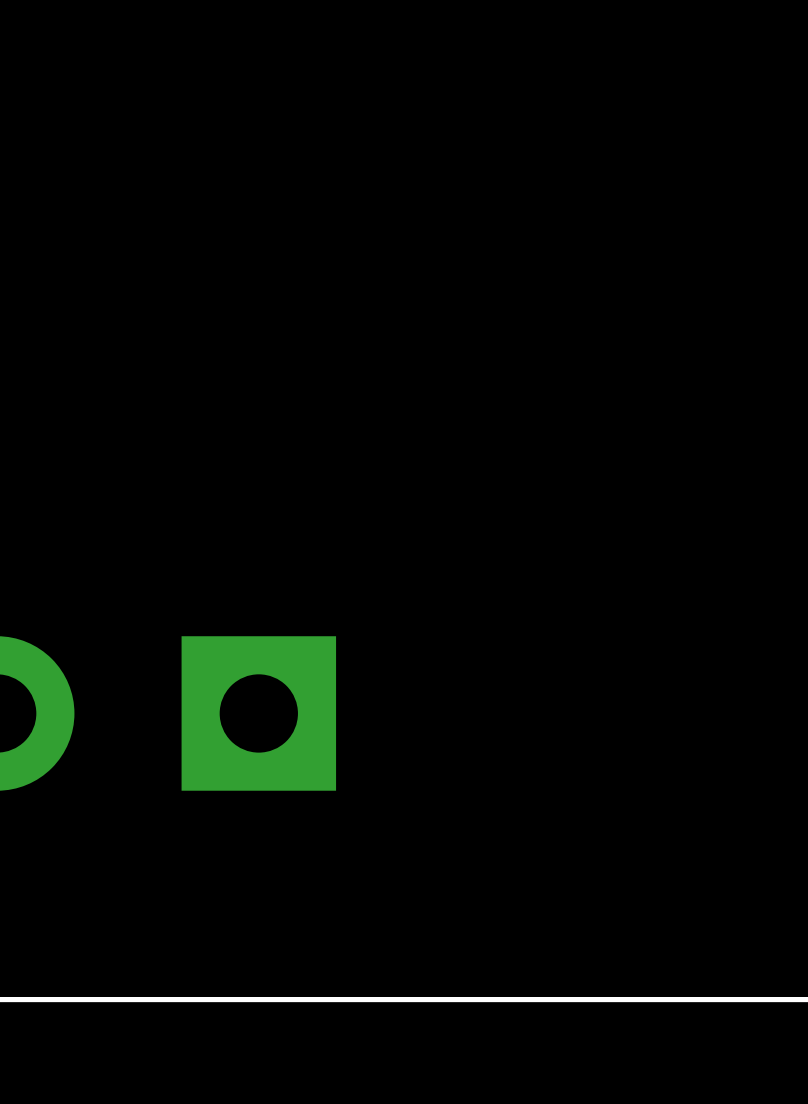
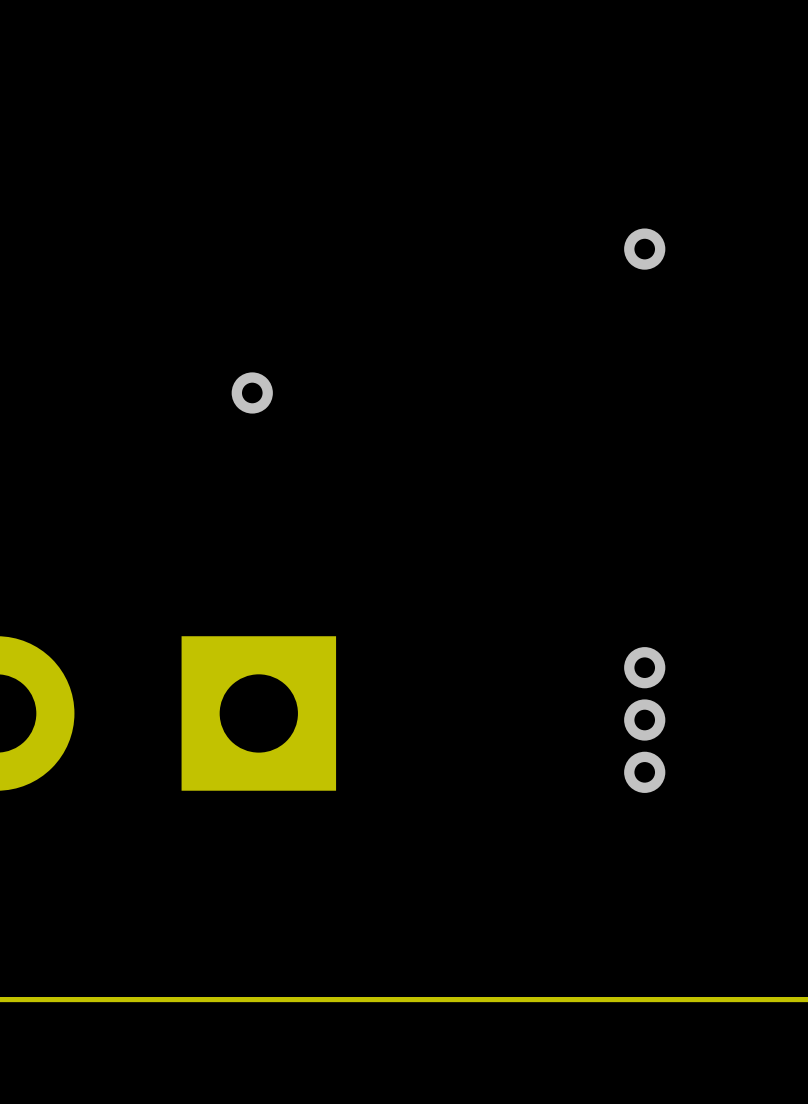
via: none -> (644, 249)
via: none -> (252, 392)
via: none -> (644, 667)
via: none -> (644, 720)
via: none -> (644, 772)

